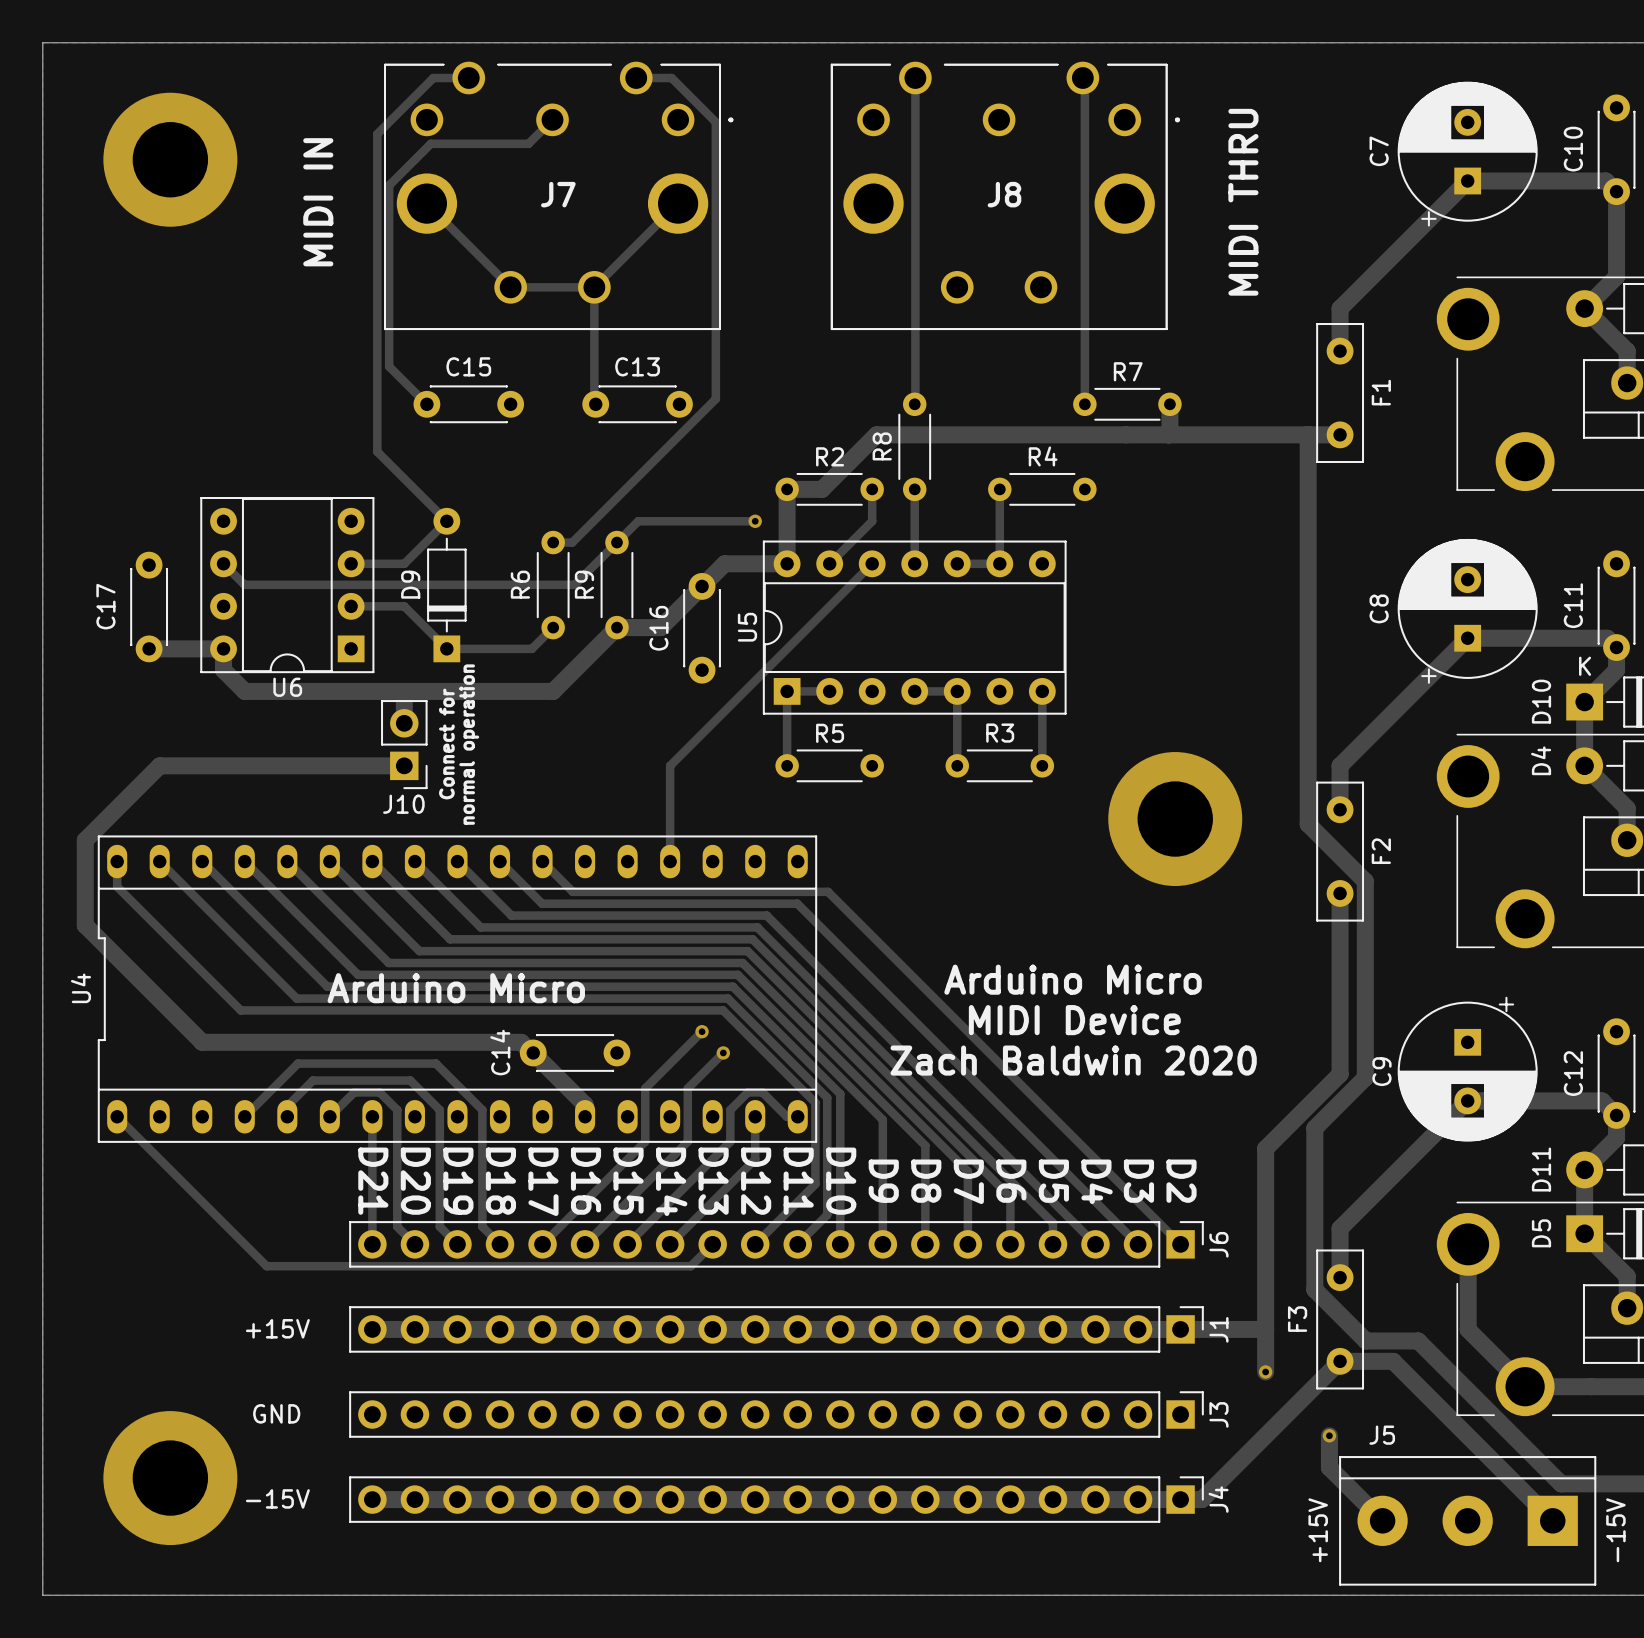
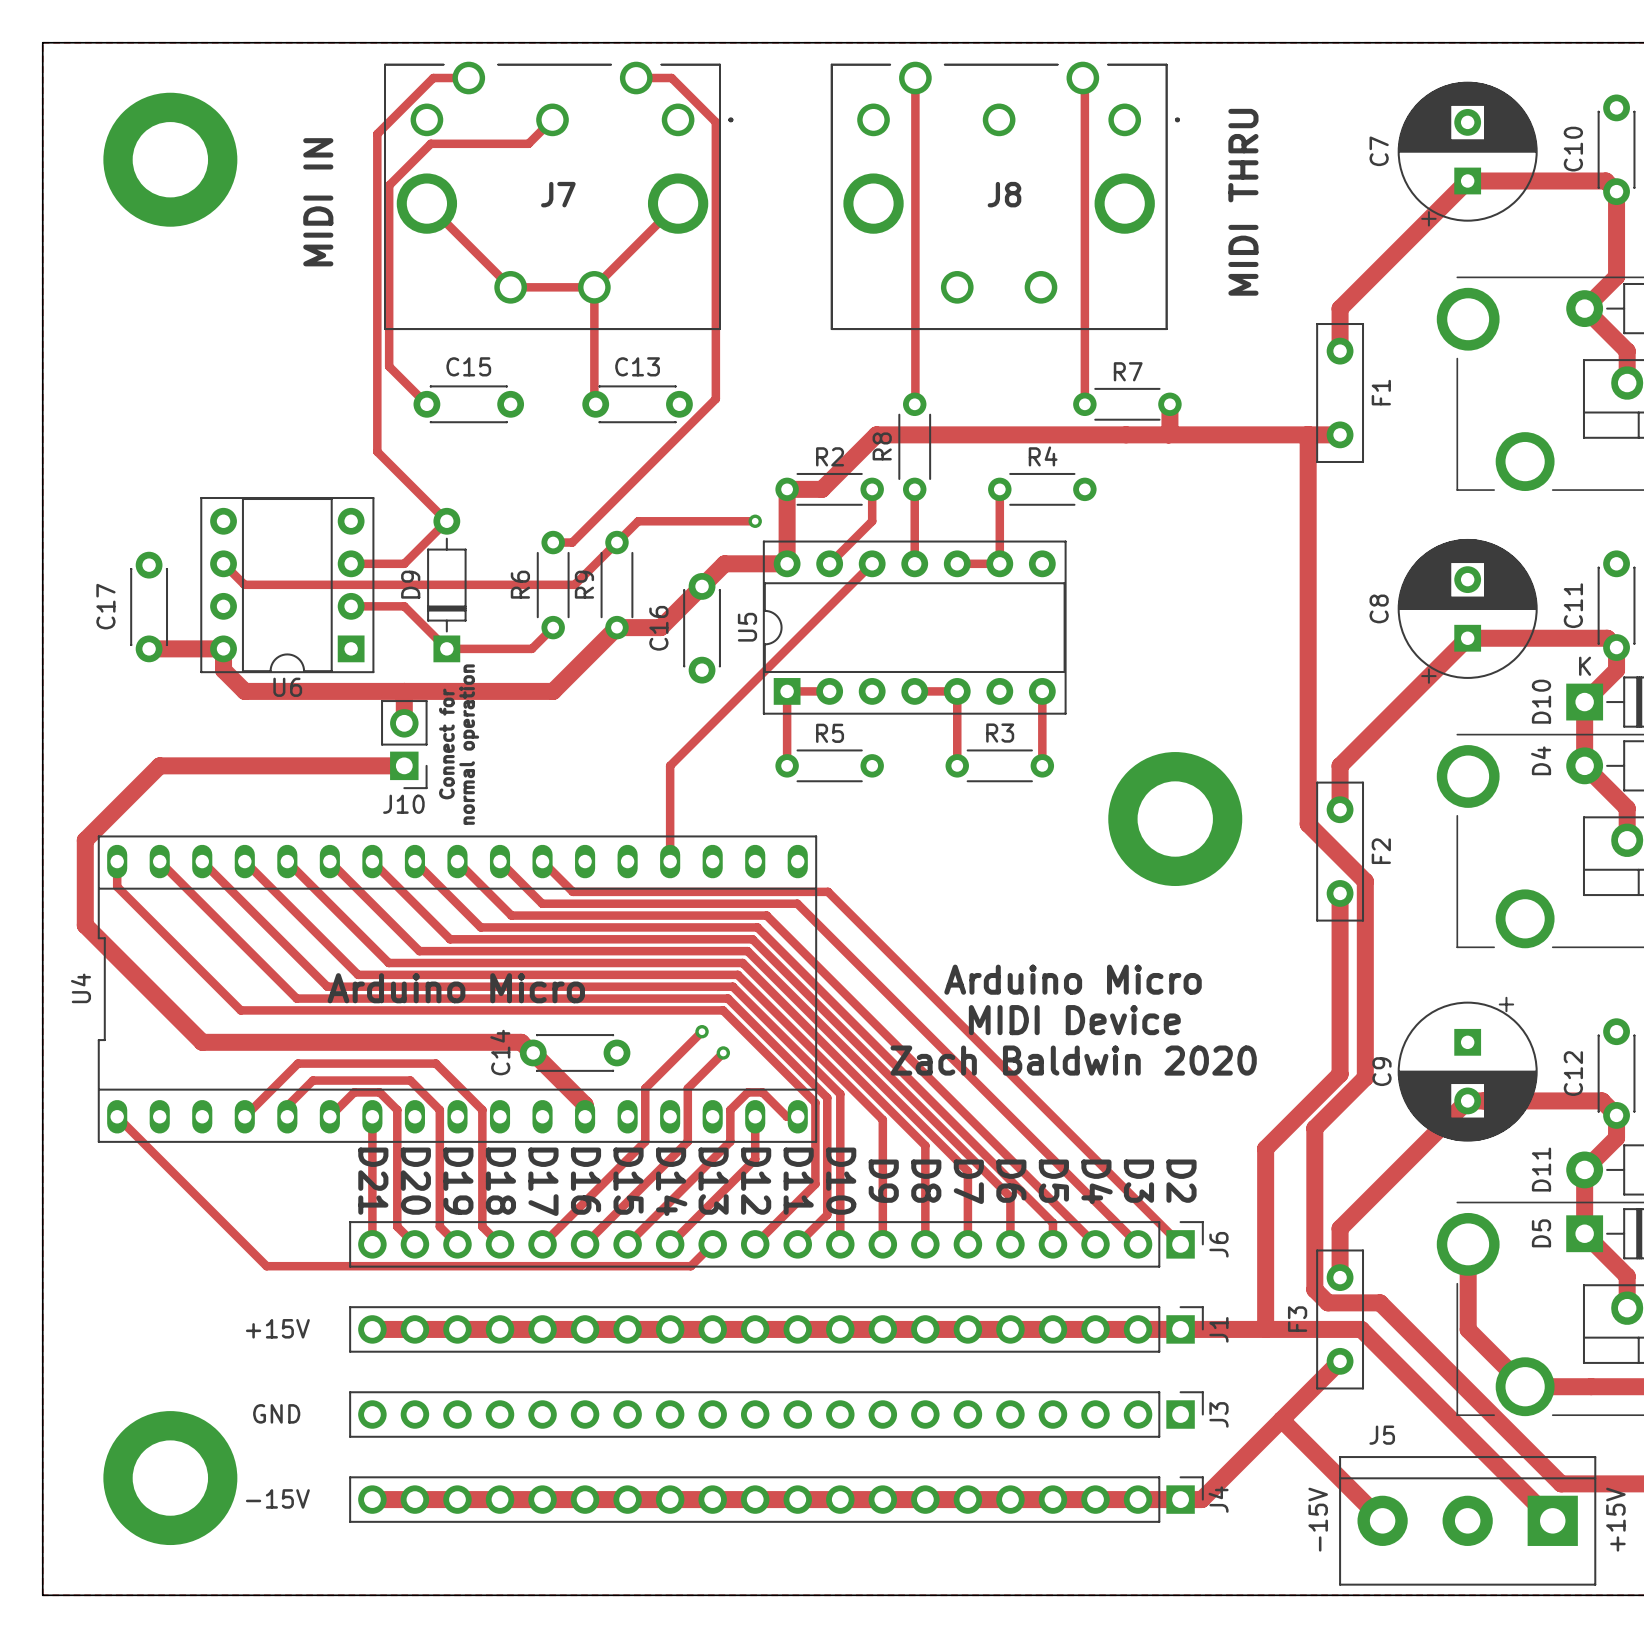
track: (1327, 1302) (1366, 1340) (1418, 1340) -> (1327, 1302) (1380, 1302) (1418, 1340)
track: (1265, 1329) (1265, 1371) -> none
track: (1340, 1361) (1393, 1361) -> (1265, 1329) (1361, 1329) (1393, 1361)
via: (1265, 1371) -> none
track: (1329, 1435) (1329, 1467) -> (1281, 1419) (1329, 1467)
via: (1329, 1435) -> none
text: +15V (1318, 1530) -> -15V (1318, 1519)
text: -15V (1615, 1530) -> +15V (1615, 1519)

